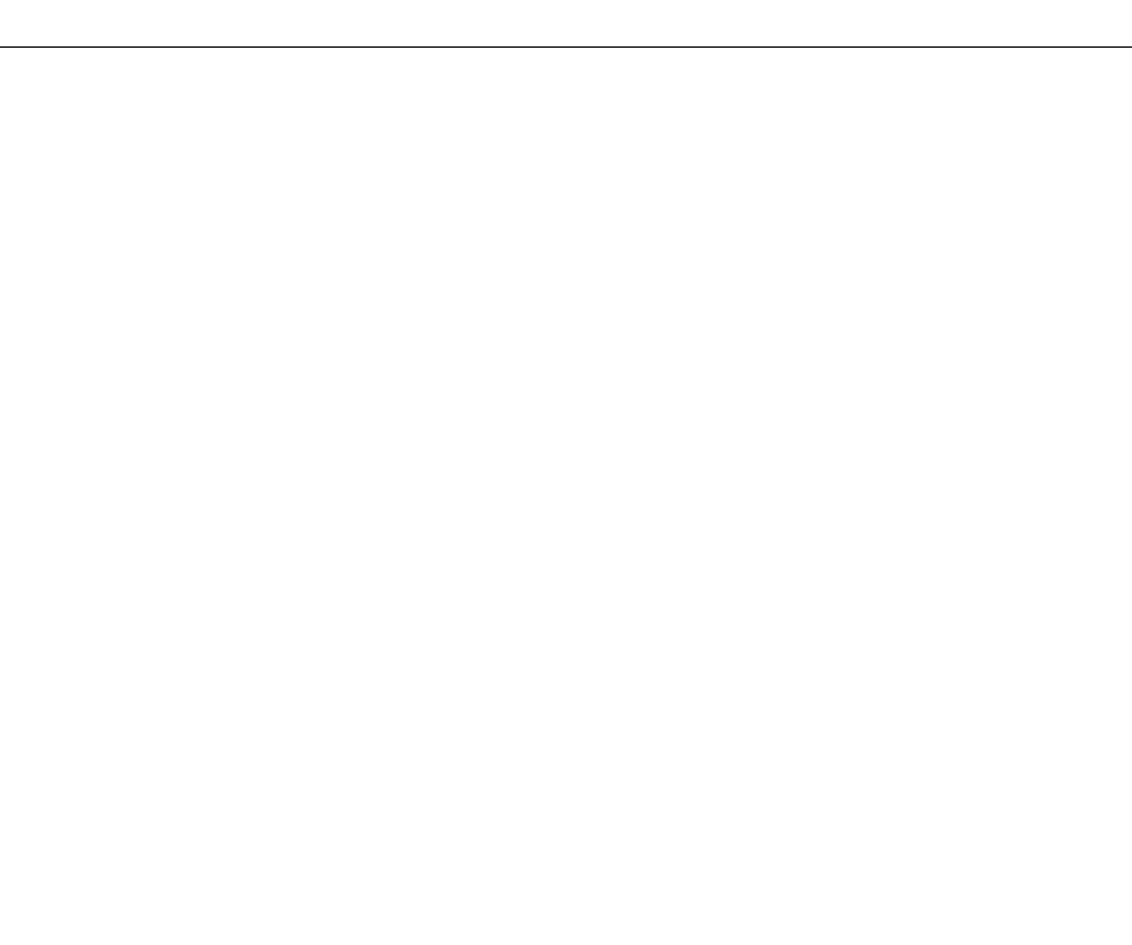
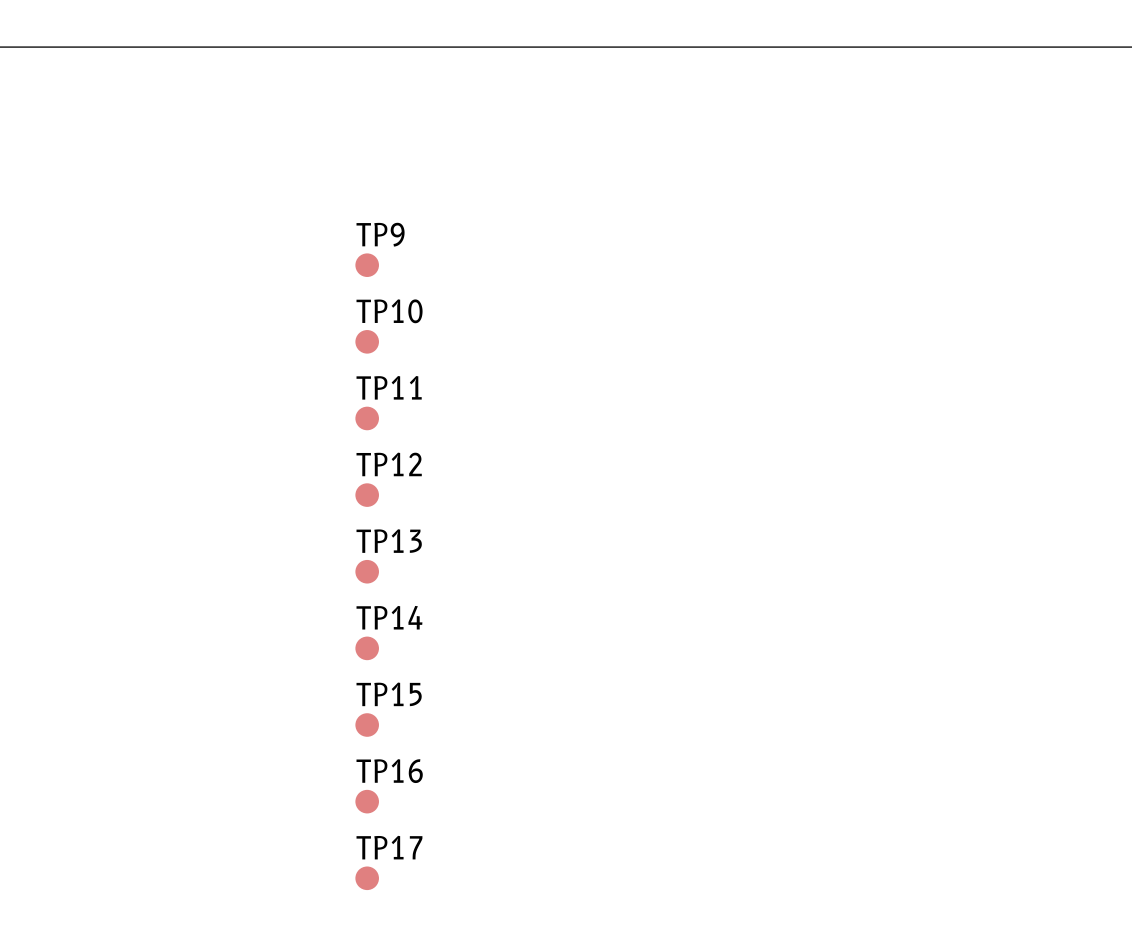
TP9: none -> (367, 265)
TP10: none -> (367, 341)
TP11: none -> (367, 418)
TP12: none -> (367, 495)
TP13: none -> (367, 571)
TP14: none -> (367, 648)
TP15: none -> (367, 725)
TP16: none -> (367, 801)
TP17: none -> (367, 878)

